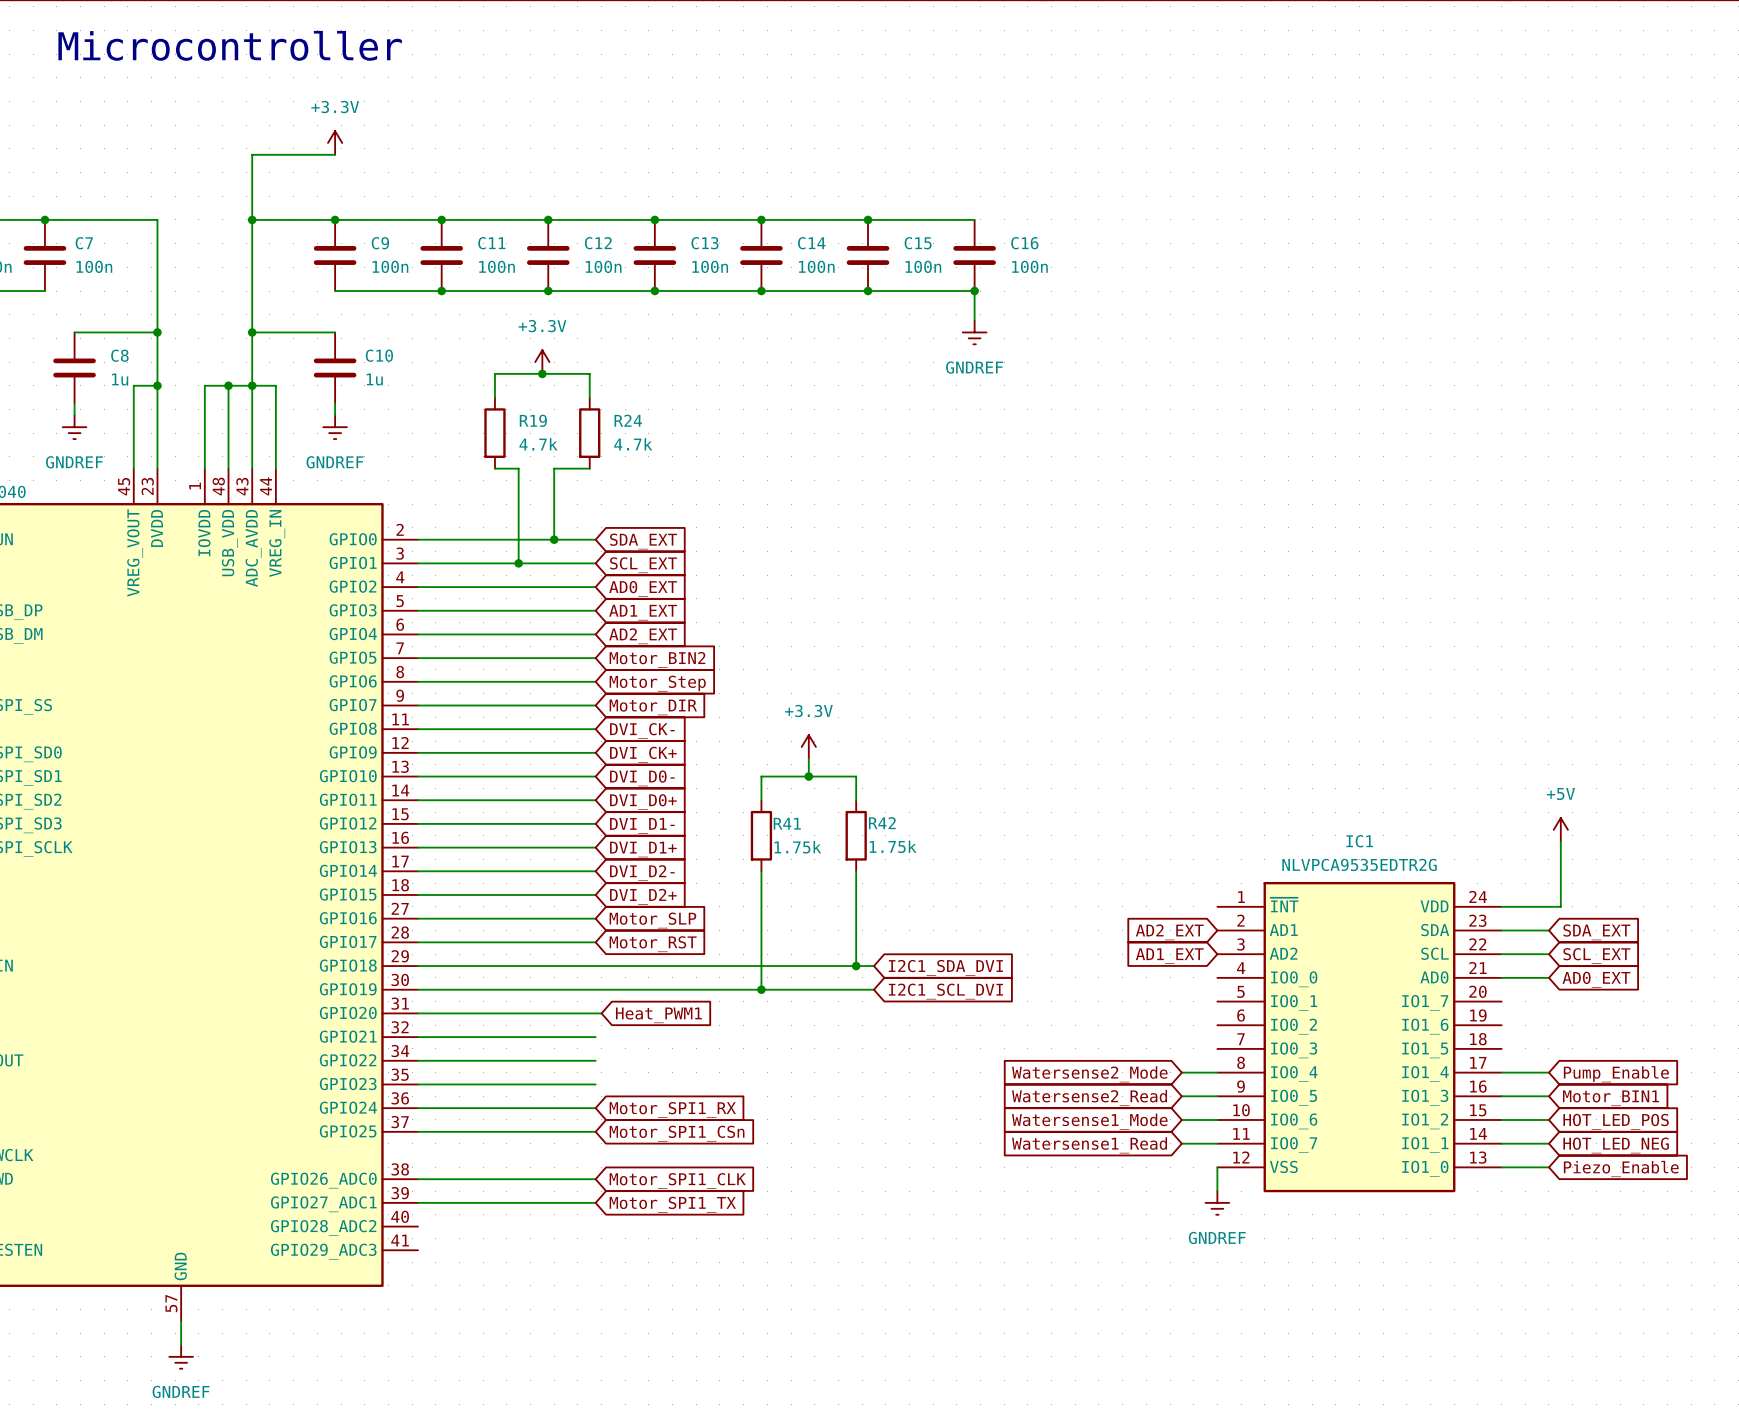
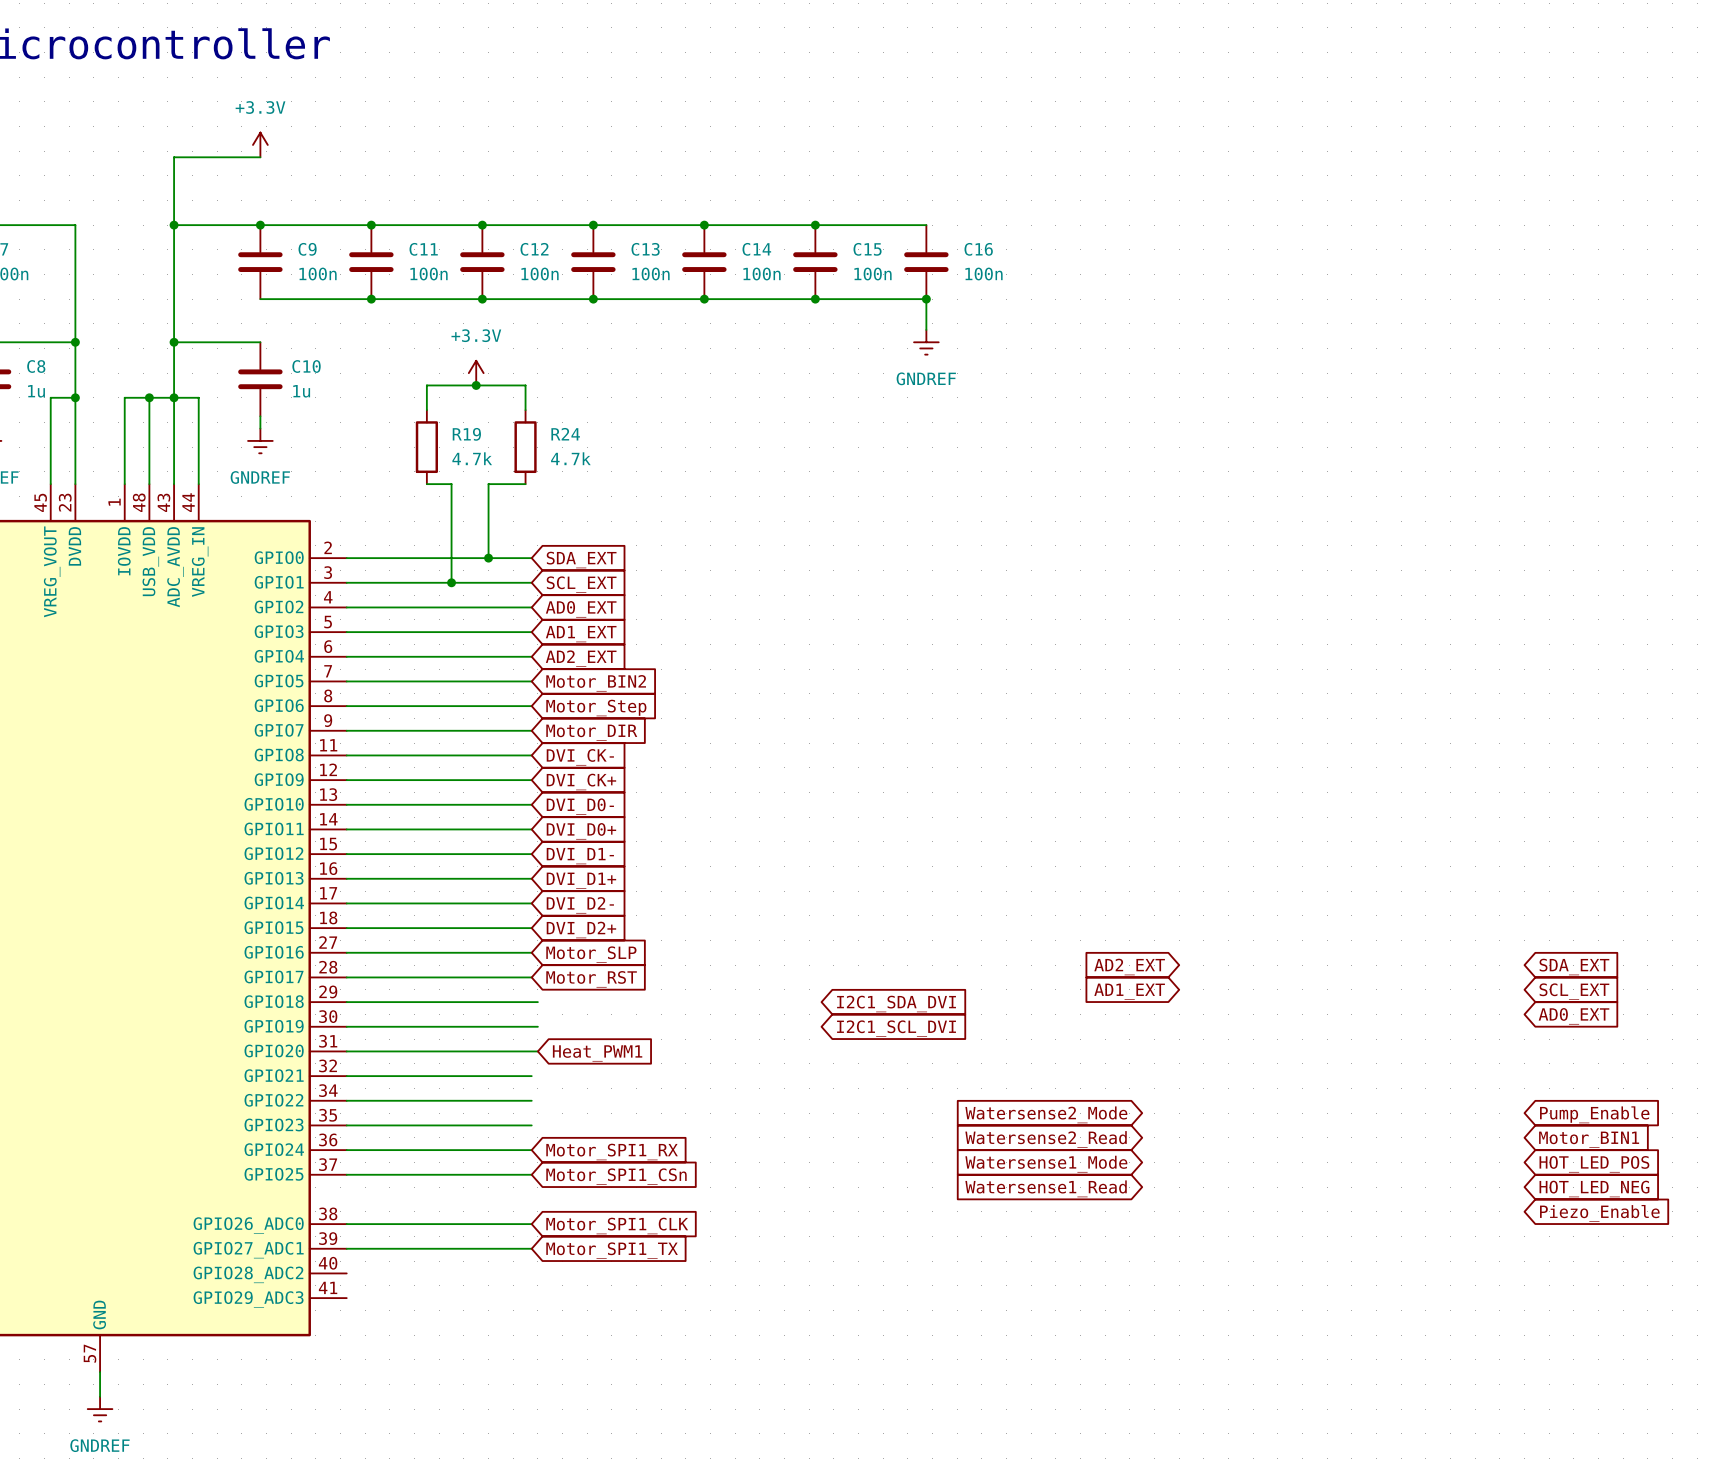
power symbol: +3.3V (808, 746) -> none
wire: (808, 758) (808, 776) -> none
junction: (808, 776) -> none
wire: (761, 800) (761, 776) (856, 776) (856, 800) -> none
power symbol: +5V (1560, 829) -> none
R41: 1.75k (761, 835) -> none
R42: 1.75k (856, 835) -> none
wire: (1560, 841) (1560, 906) (1501, 906) -> none
wire: (761, 871) (761, 989) -> none
wire: (856, 871) (856, 966) -> none
wire: (1501, 930) (1548, 930) -> none
wire: (1501, 954) (1548, 954) -> none
wire: (601, 966) (873, 966) -> none
junction: (856, 966) -> none
wire: (1501, 977) (1548, 977) -> none
wire: (601, 989) (873, 989) -> none
junction: (761, 989) -> none
IC1: NLVPCA9535EDTR2G (1359, 1037) -> none
wire: (1181, 1072) (1217, 1072) -> none
wire: (1501, 1072) (1548, 1072) -> none
wire: (1181, 1096) (1217, 1096) -> none
wire: (1501, 1096) (1548, 1096) -> none
wire: (1181, 1119) (1217, 1119) -> none
wire: (1501, 1119) (1548, 1119) -> none
wire: (1181, 1143) (1217, 1143) -> none
wire: (1501, 1143) (1548, 1143) -> none
wire: (1217, 1167) (1217, 1191) -> none
wire: (1501, 1167) (1548, 1167) -> none
power symbol: GNDREF (1217, 1202) -> none

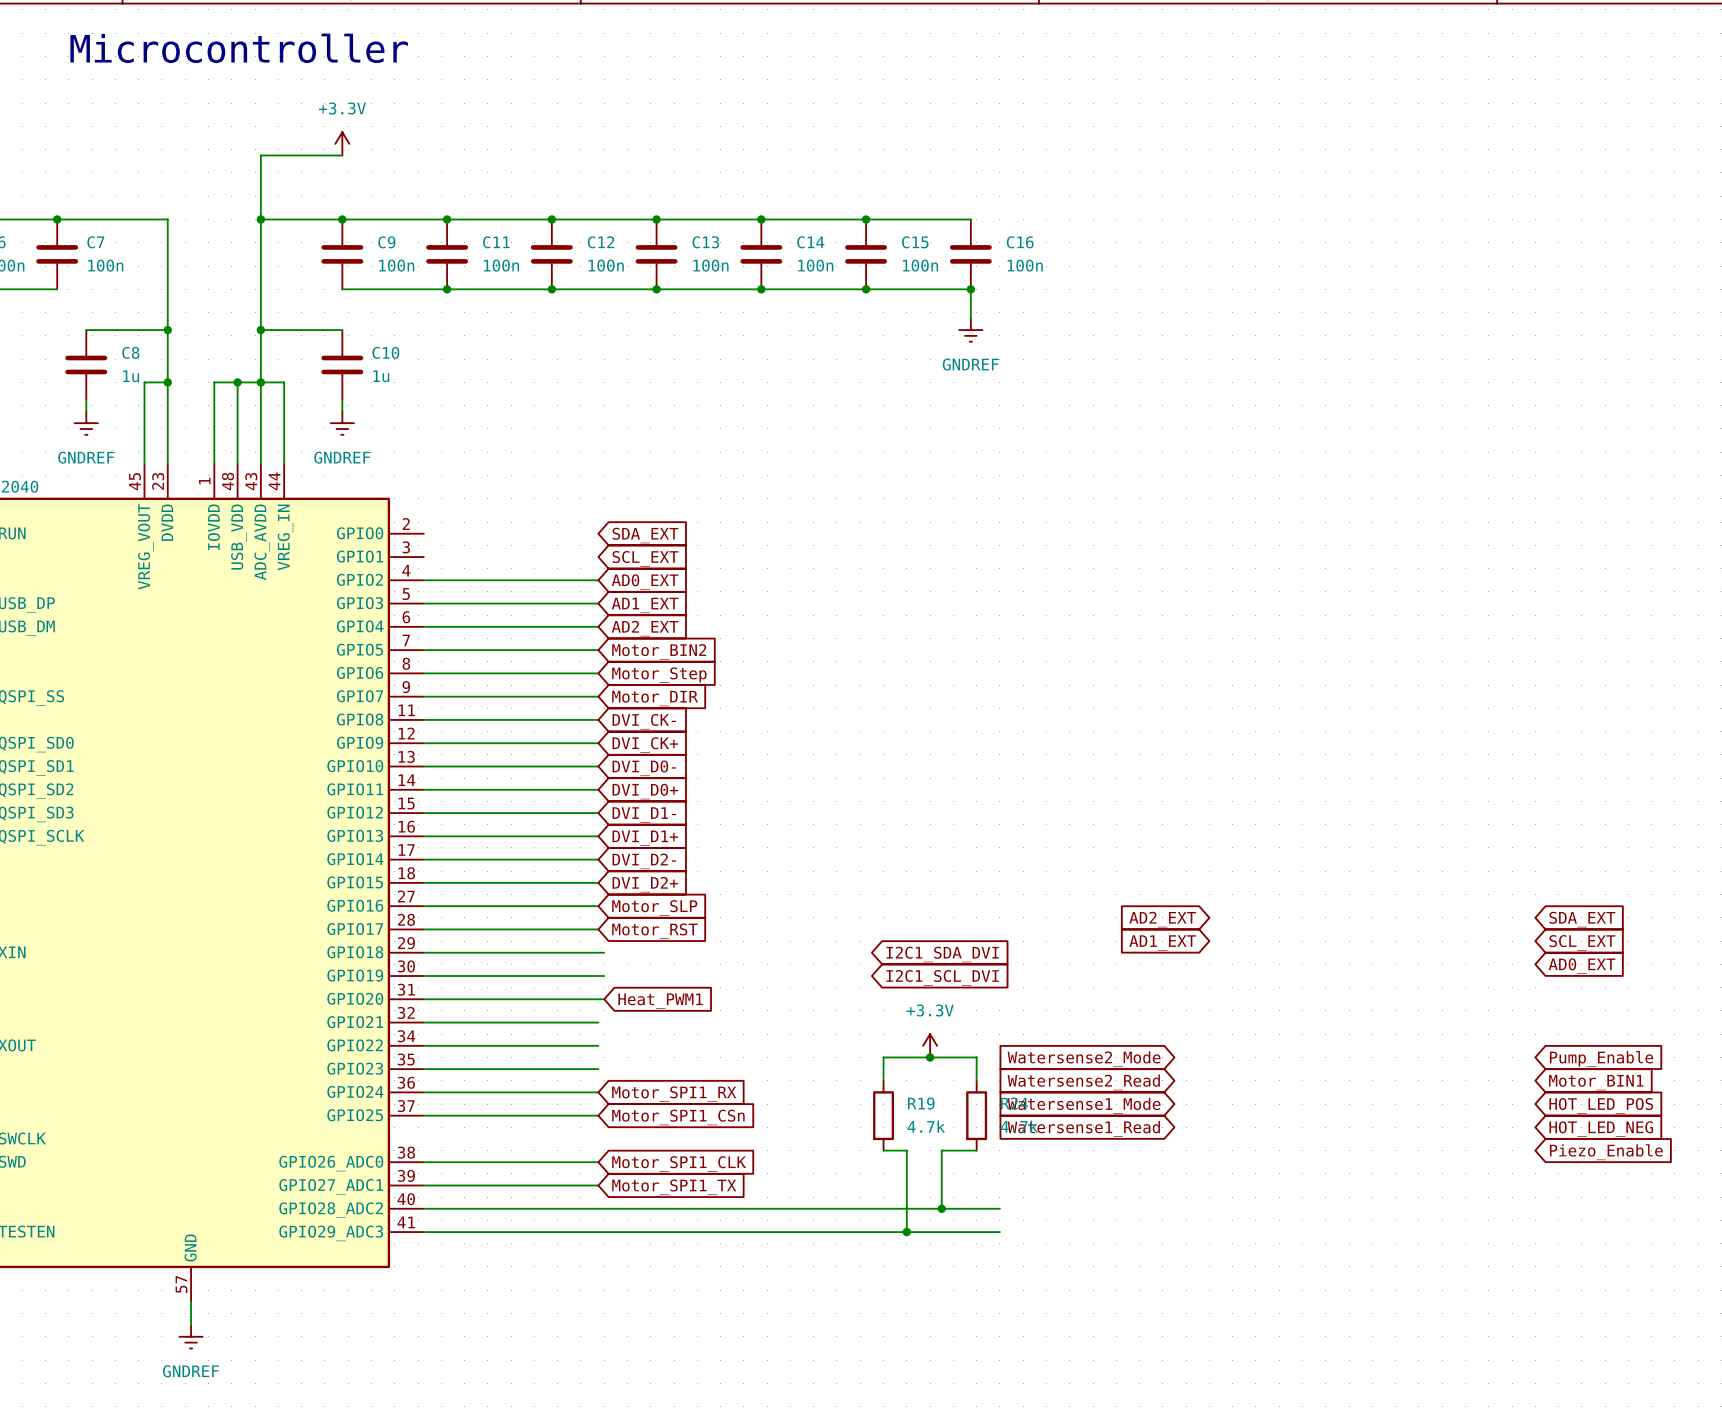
power symbol: +3.3V (476, 373) -> none
junction: (476, 385) -> none
wire: (426, 410) (426, 385) (525, 385) (525, 410) -> none
R19 position: (426, 447) -> (883, 1115)
R24 position: (525, 447) -> (976, 1115)
wire: (426, 484) (451, 484) (451, 582) -> none
wire: (525, 484) (488, 484) (488, 558) -> none
wire: (346, 558) (531, 558) -> none
junction: (488, 558) -> none
wire: (346, 582) (531, 582) -> none
junction: (451, 582) -> none
power symbol: none -> +3.3V (930, 1045)
junction: none -> (930, 1057)
wire: none -> (883, 1080) (883, 1057) (976, 1057) (976, 1080)
wire: none -> (883, 1150) (906, 1150) (906, 1232)
wire: none -> (976, 1150) (941, 1150) (941, 1208)
wire: none -> (423, 1208) (999, 1208)
junction: none -> (941, 1208)
wire: none -> (423, 1232) (999, 1232)
junction: none -> (906, 1232)

